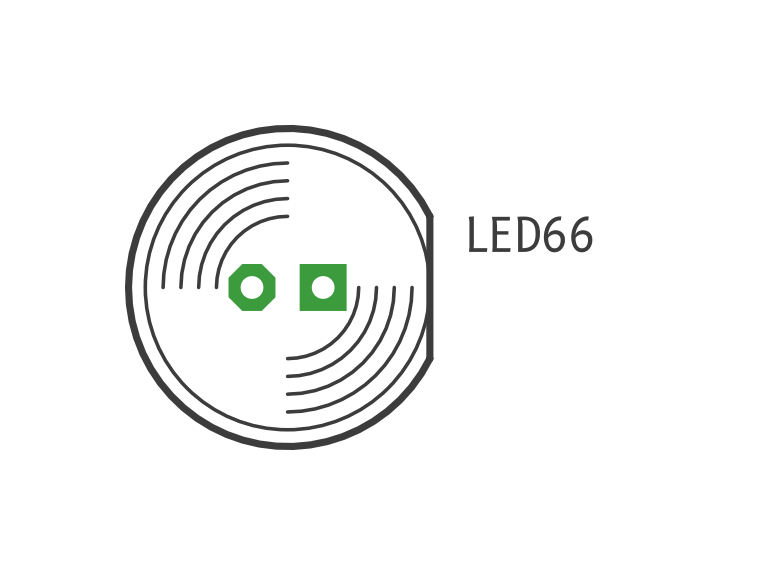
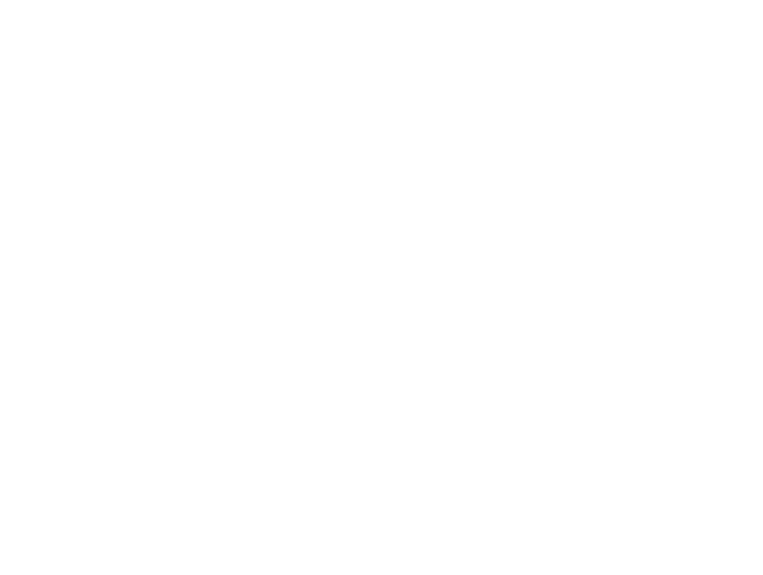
LED66: (279, 287) -> none

